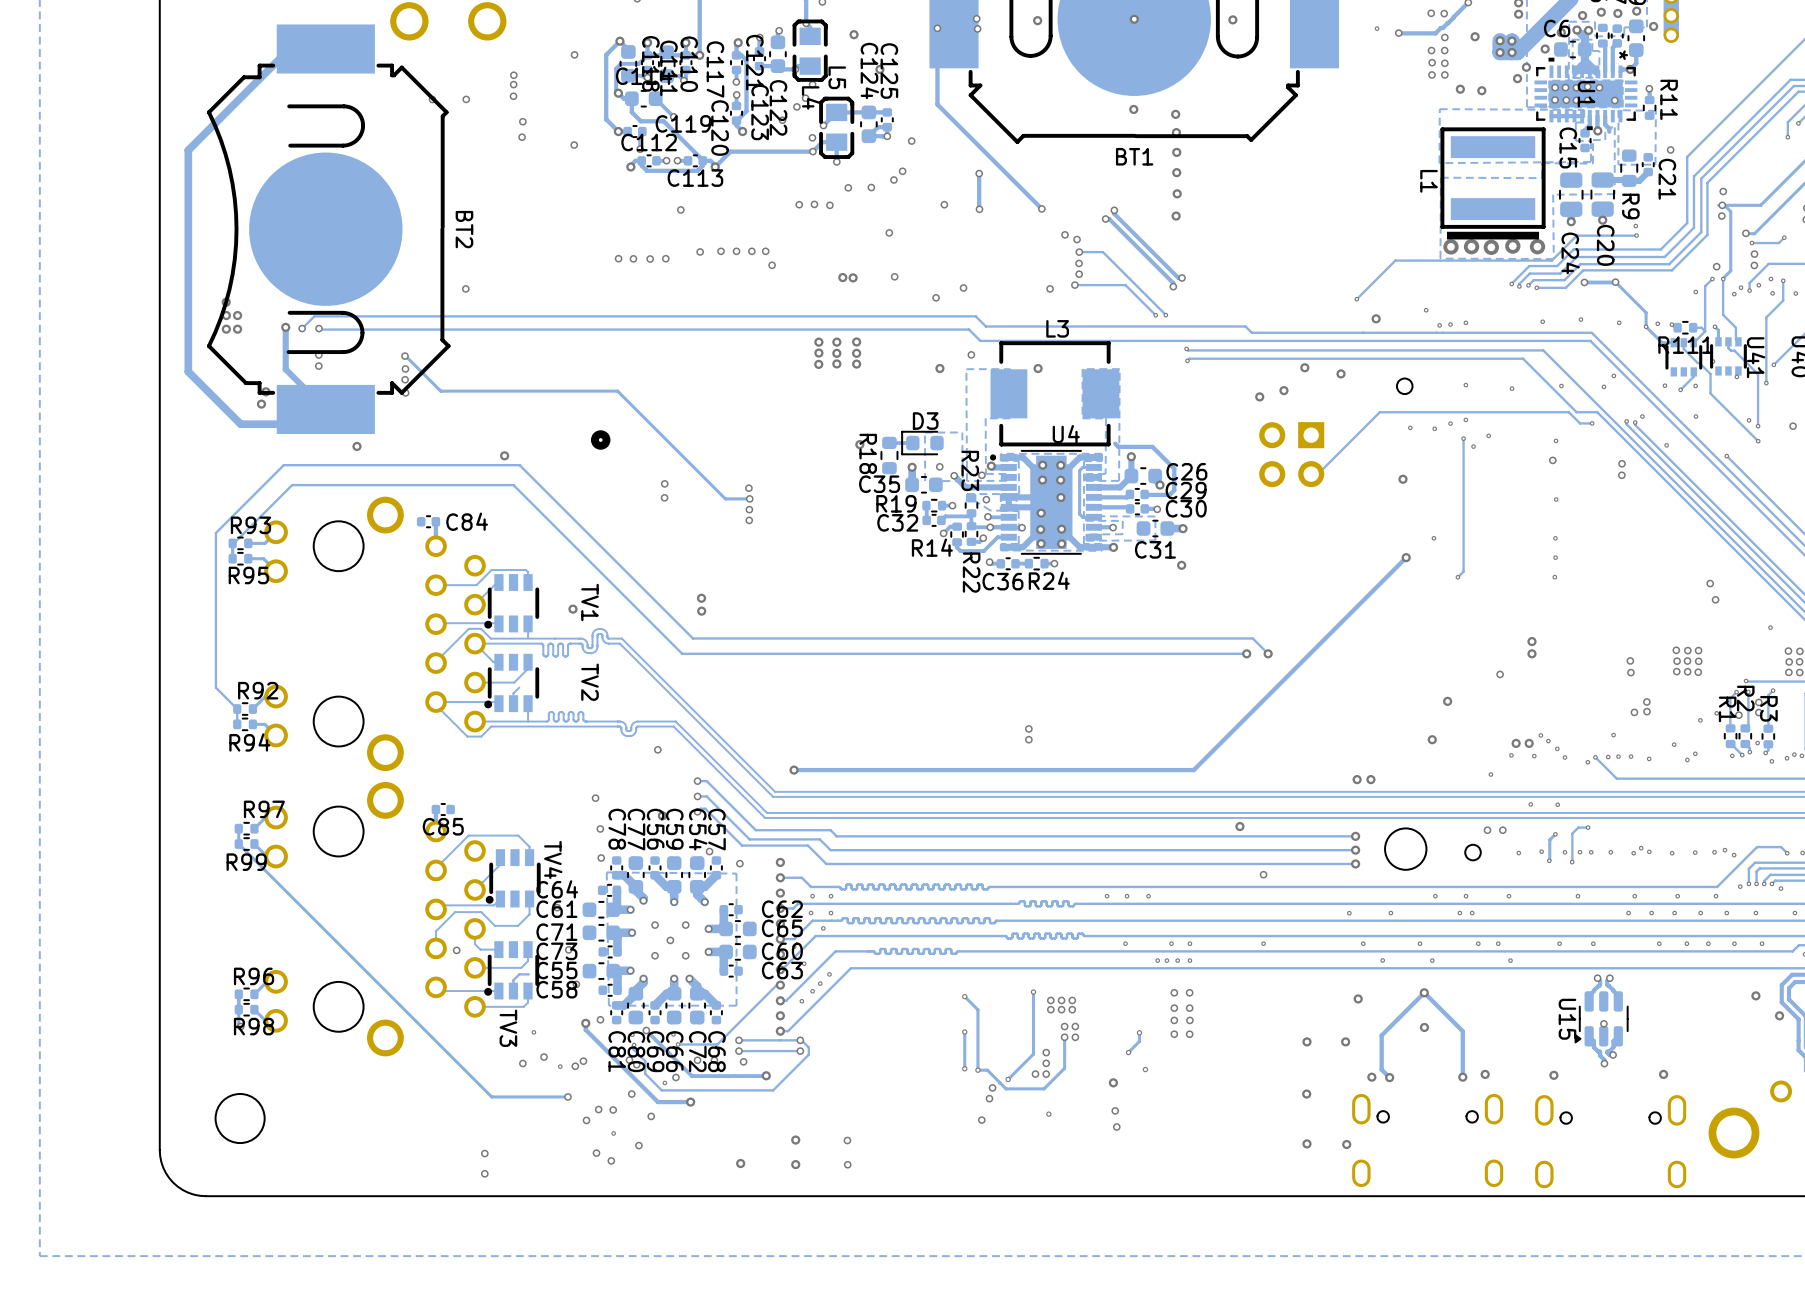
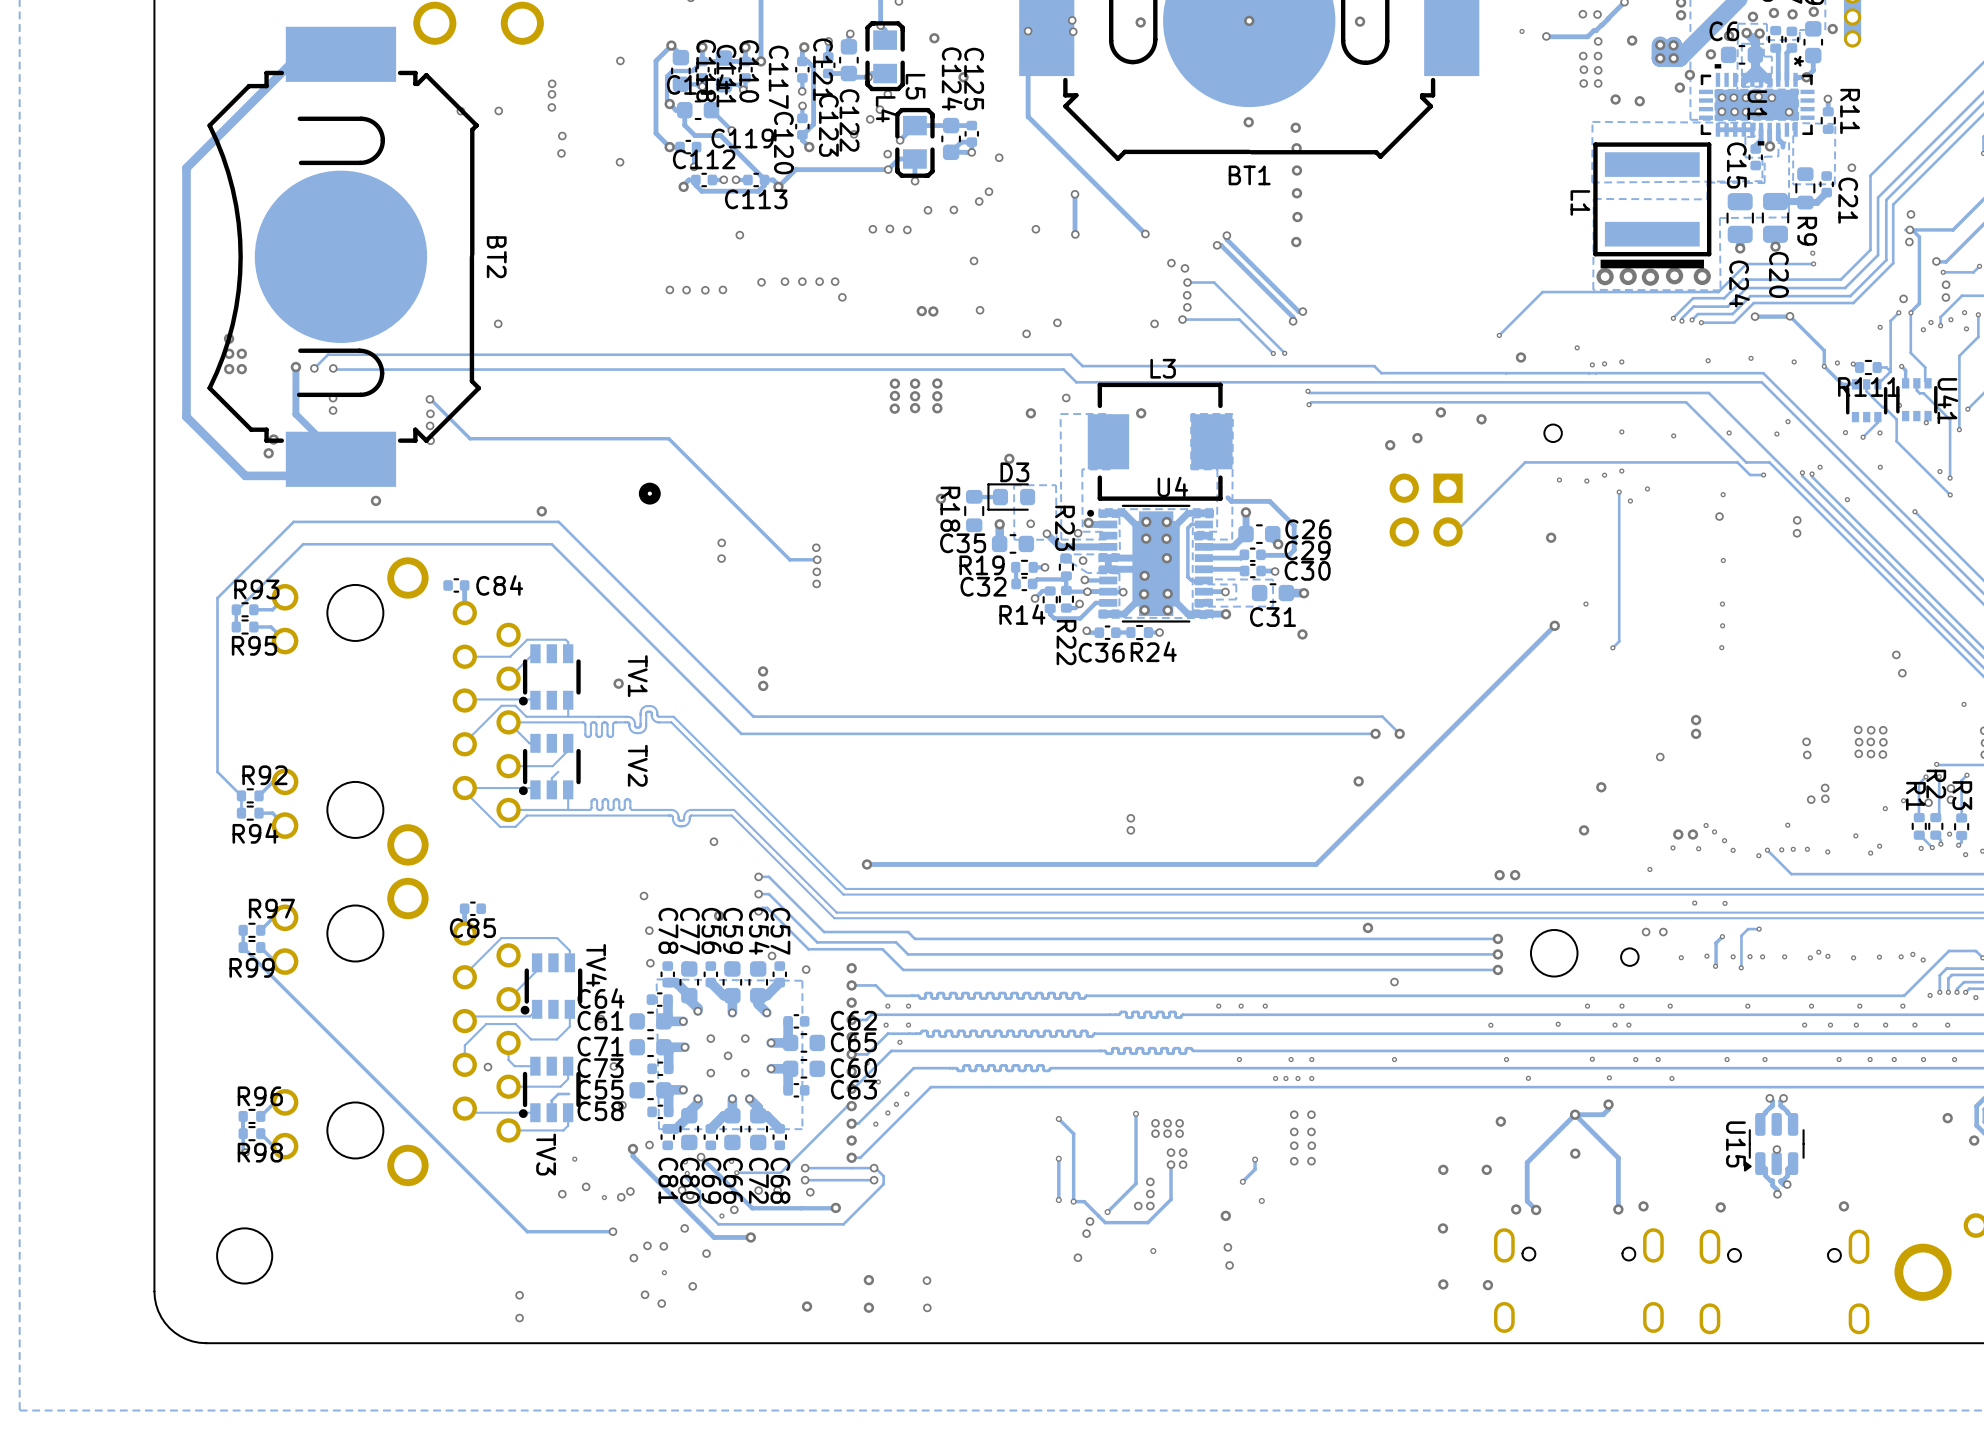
via: none -> (1009, 458)
via: none -> (1358, 781)
via: none -> (1558, 1024)
via: (1390, 913) -> none
via: (1420, 943) -> none
via: none -> (1592, 1059)
via: none -> (1609, 1077)
via: (1432, 960) -> none
track: none -> (1608, 1104) (1608, 1109) (1603, 1114) (1575, 1114)
via: none -> (1608, 1104)

